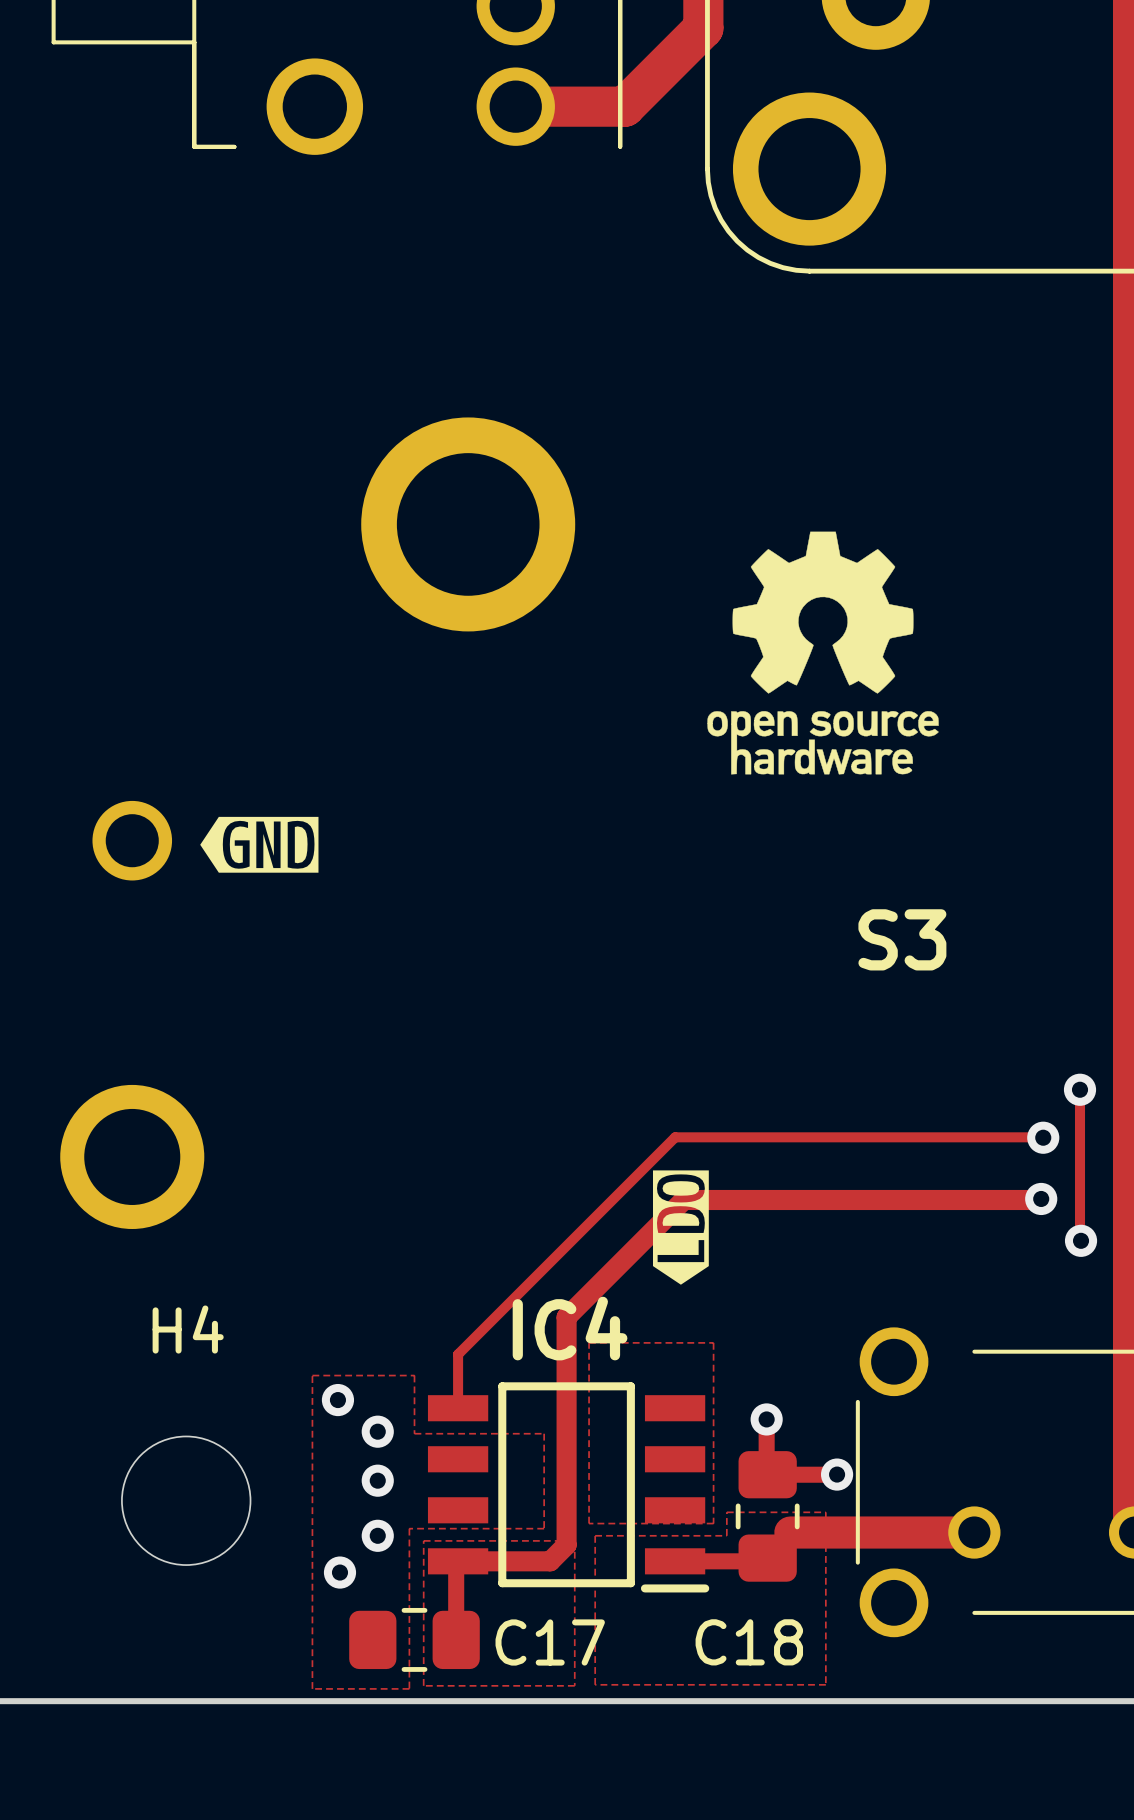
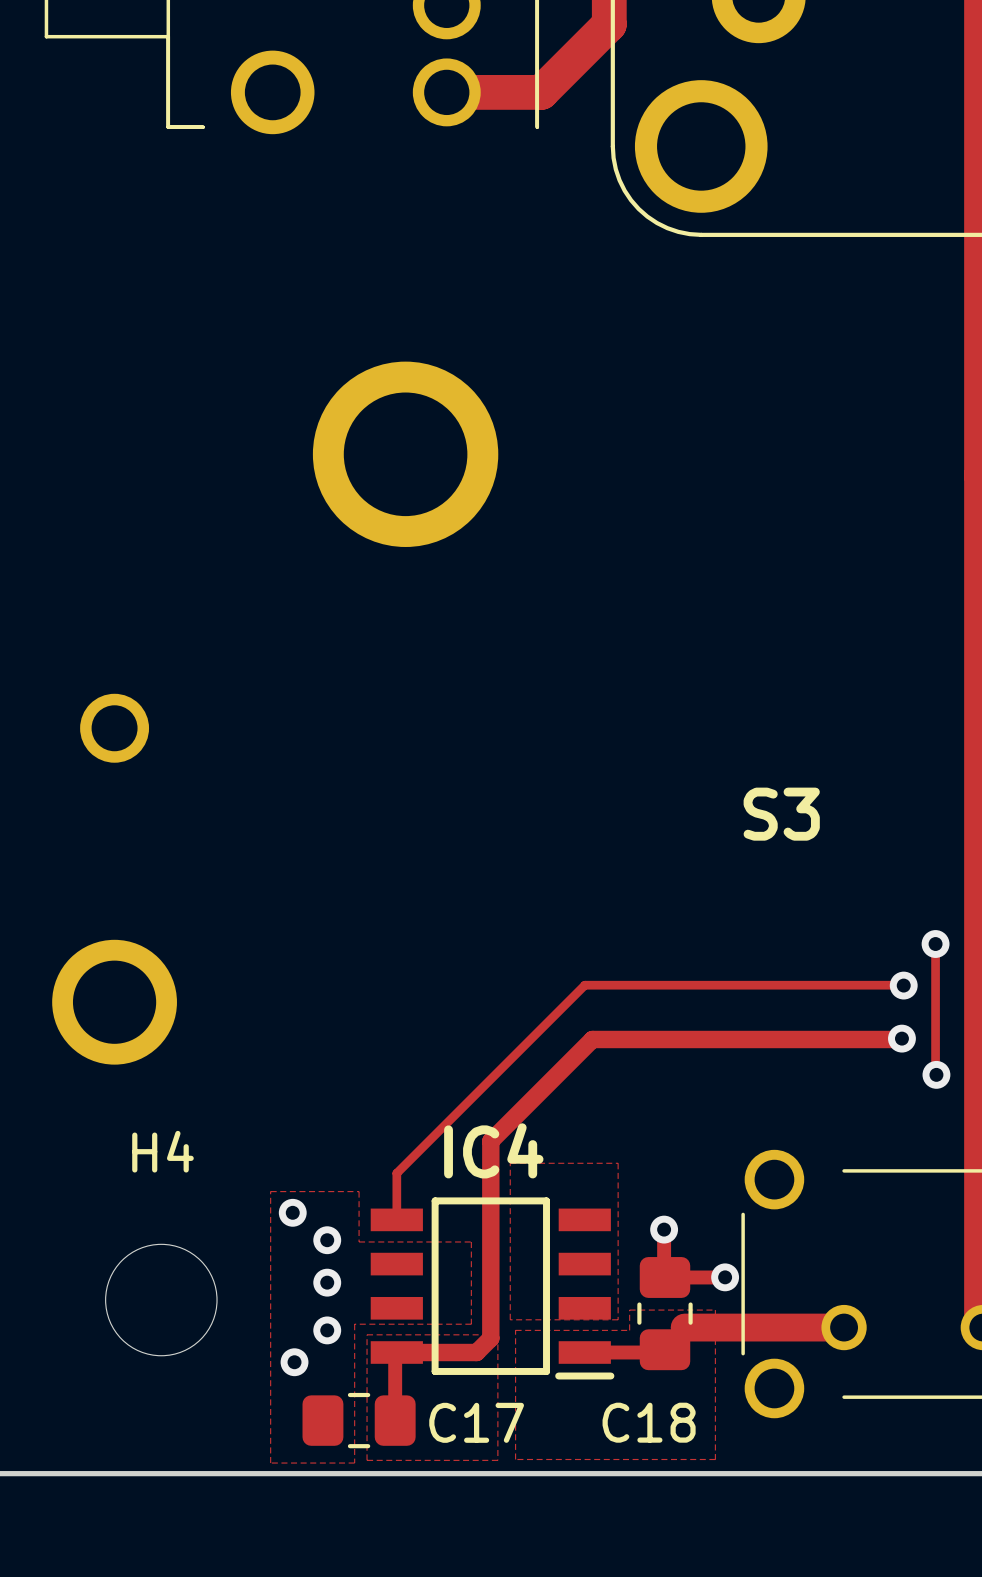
drawing: [707, 531, 939, 775] -> none
drawing: [200, 816, 319, 873] -> none
drawing: [653, 1170, 709, 1285] -> none

